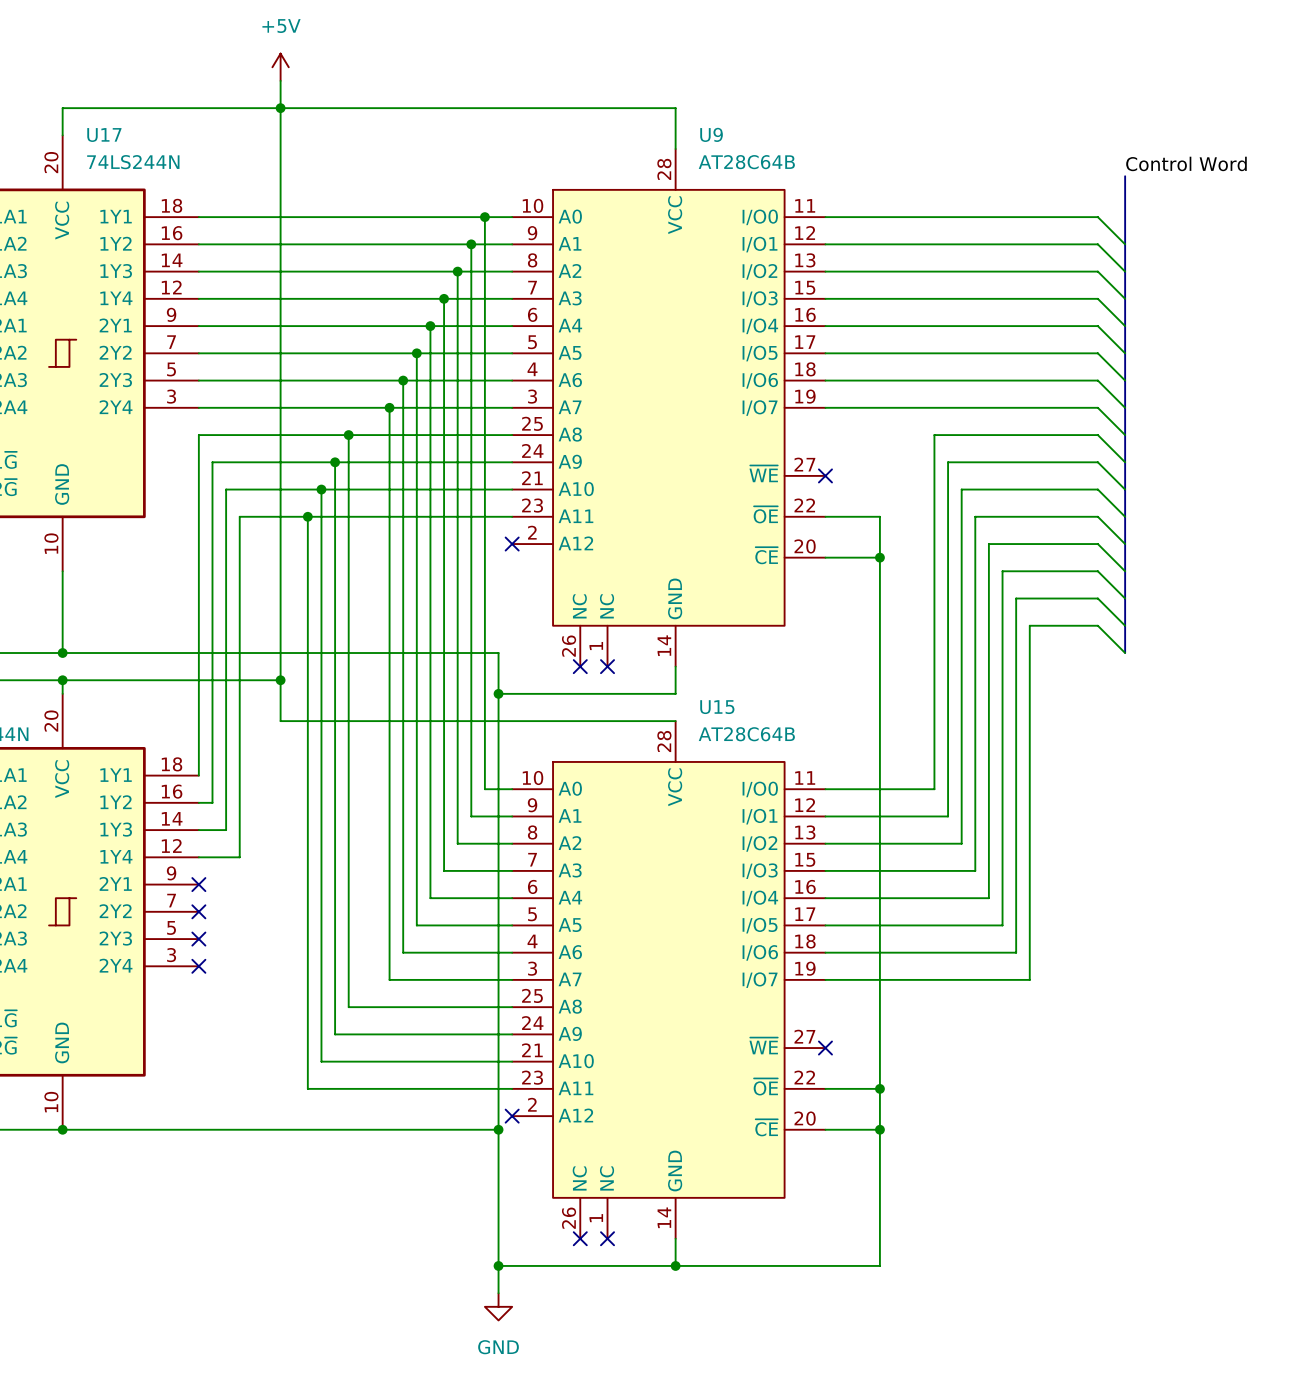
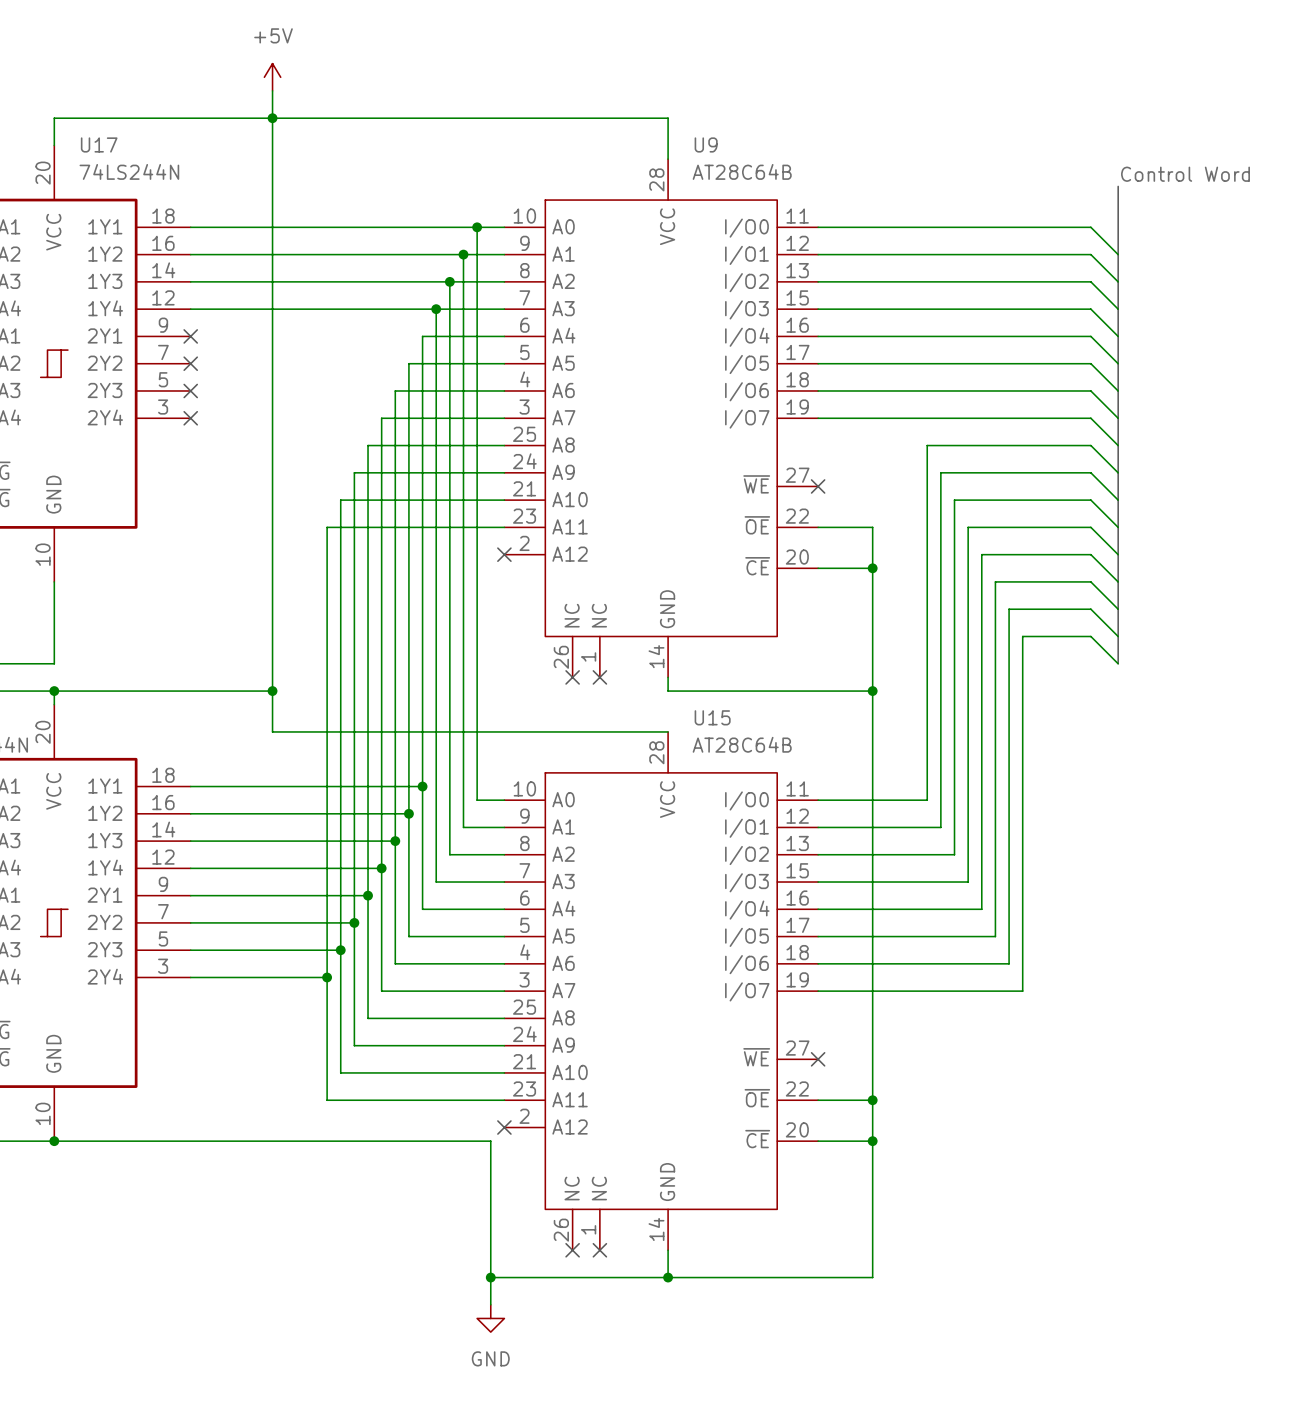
wire: (198, 326) (430, 326) -> none
no-connect mark: none -> (190, 336)
junction: (430, 326) -> none
wire: (198, 353) (416, 353) -> none
no-connect mark: none -> (190, 363)
junction: (416, 353) -> none
wire: (198, 380) (403, 380) -> none
no-connect mark: none -> (190, 390)
junction: (403, 380) -> none
wire: (198, 407) (389, 407) -> none
no-connect mark: none -> (190, 418)
junction: (389, 407) -> none
wire: (348, 435) (348, 489) (226, 489) (226, 830) -> (395, 841) (217, 841)
junction: (348, 435) -> none
wire: (375, 435) (198, 435) (198, 775) -> (368, 445) (368, 1018)
wire: (335, 462) (335, 516) (239, 516) (239, 857) -> (381, 868) (231, 868)
junction: (335, 462) -> none
wire: (362, 462) (212, 462) (212, 802) -> (354, 472) (354, 1045)
wire: (321, 489) (321, 1061) (348, 1061) -> none
junction: (321, 489) -> none
wire: (307, 516) (307, 1088) (335, 1088) -> none
junction: (307, 516) -> none
wire: (62, 653) (498, 653) (498, 1129) -> none
junction: (62, 653) -> none
wire: (675, 680) (675, 693) (498, 693) -> (668, 691) (872, 691)
junction: none -> (872, 691)
junction: (498, 693) -> none
wire: none -> (190, 786) (422, 786)
junction: none -> (422, 786)
wire: none -> (204, 813) (408, 813)
junction: none -> (408, 813)
junction: none -> (395, 841)
junction: none -> (381, 868)
wire: none -> (190, 895) (368, 895)
no-connect mark: (198, 884) -> none
junction: none -> (368, 895)
wire: none -> (190, 922) (354, 922)
no-connect mark: (198, 911) -> none
junction: none -> (354, 922)
wire: none -> (190, 950) (340, 950)
no-connect mark: (198, 939) -> none
junction: none -> (340, 950)
wire: none -> (190, 977) (327, 977)
no-connect mark: (198, 966) -> none
junction: none -> (327, 977)
wire: (348, 1007) (375, 1007) -> (340, 1018) (340, 1072)
wire: (335, 1034) (362, 1034) -> (327, 1045) (327, 1100)
junction: (498, 1129) -> none

